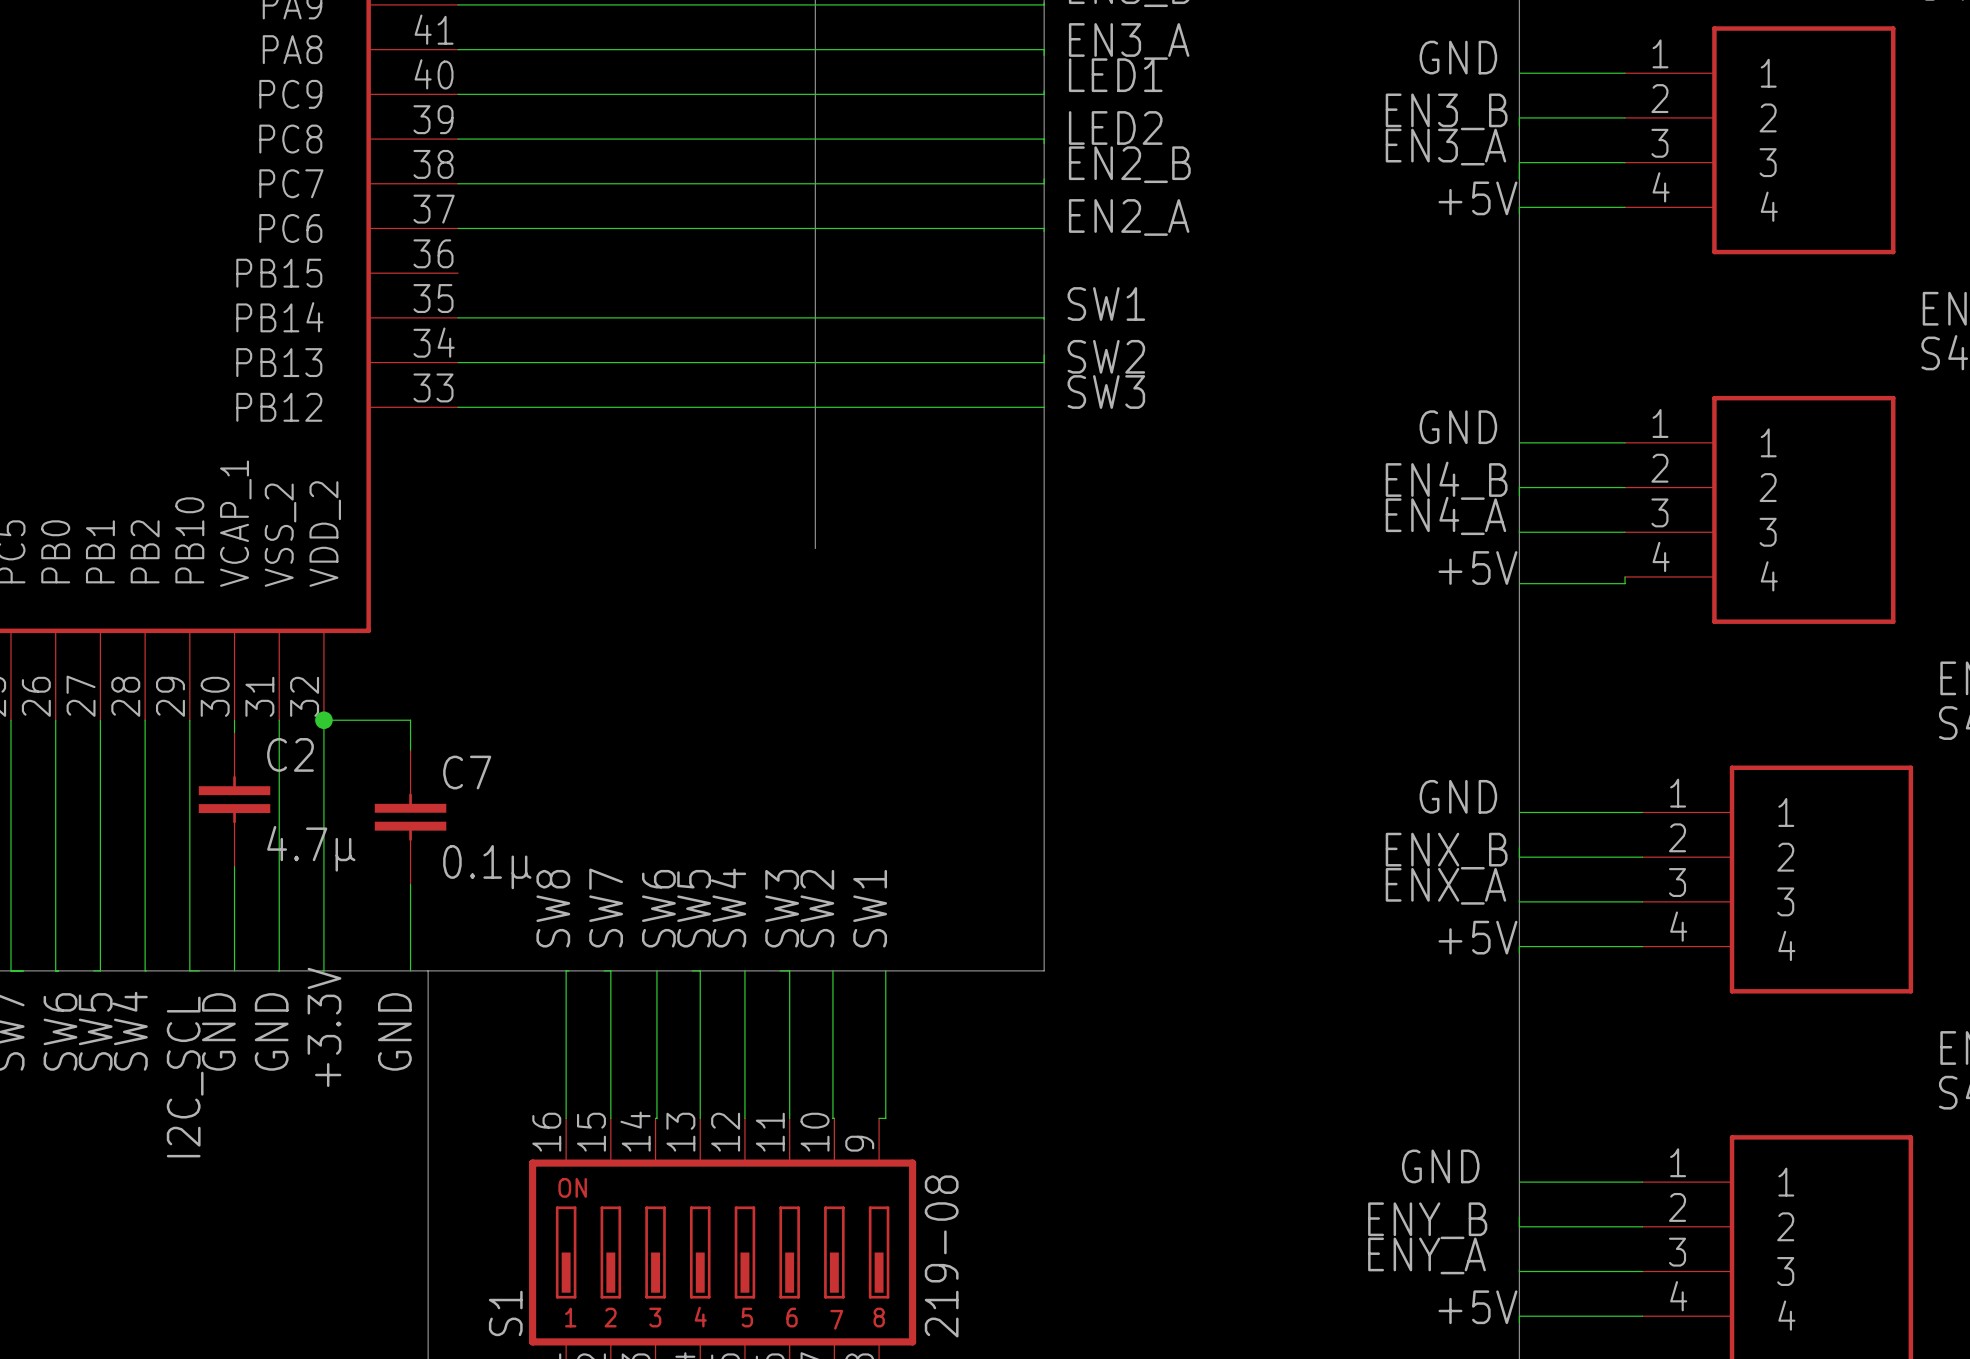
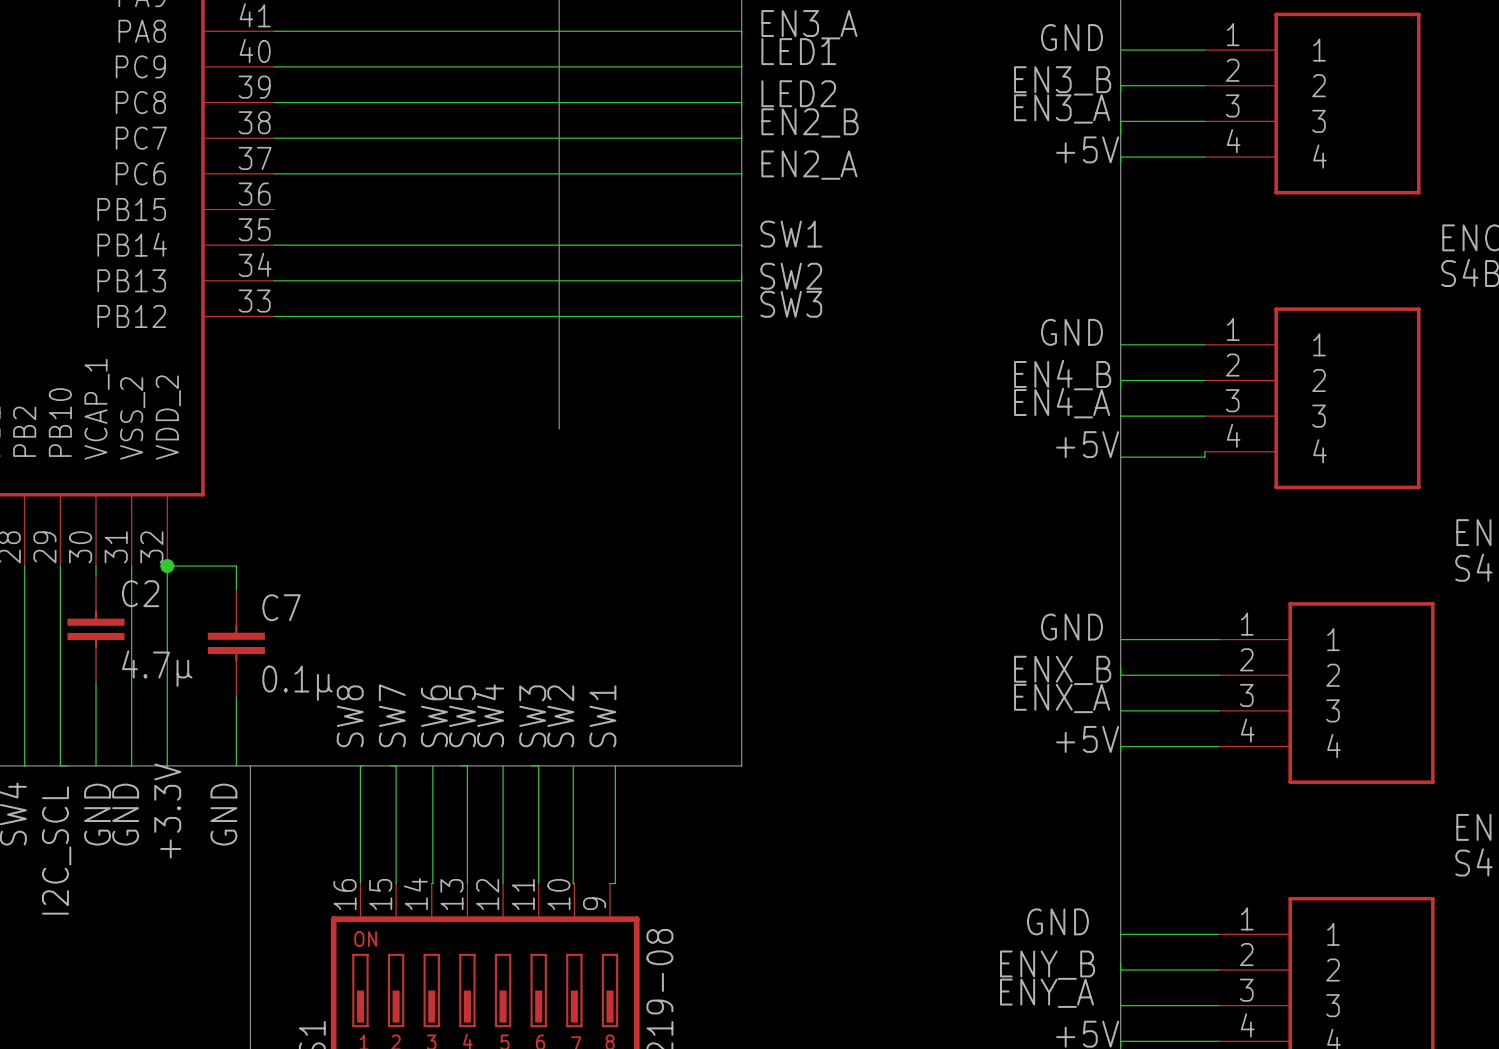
label position: GND (218, 1031) -> GND (97, 814)

